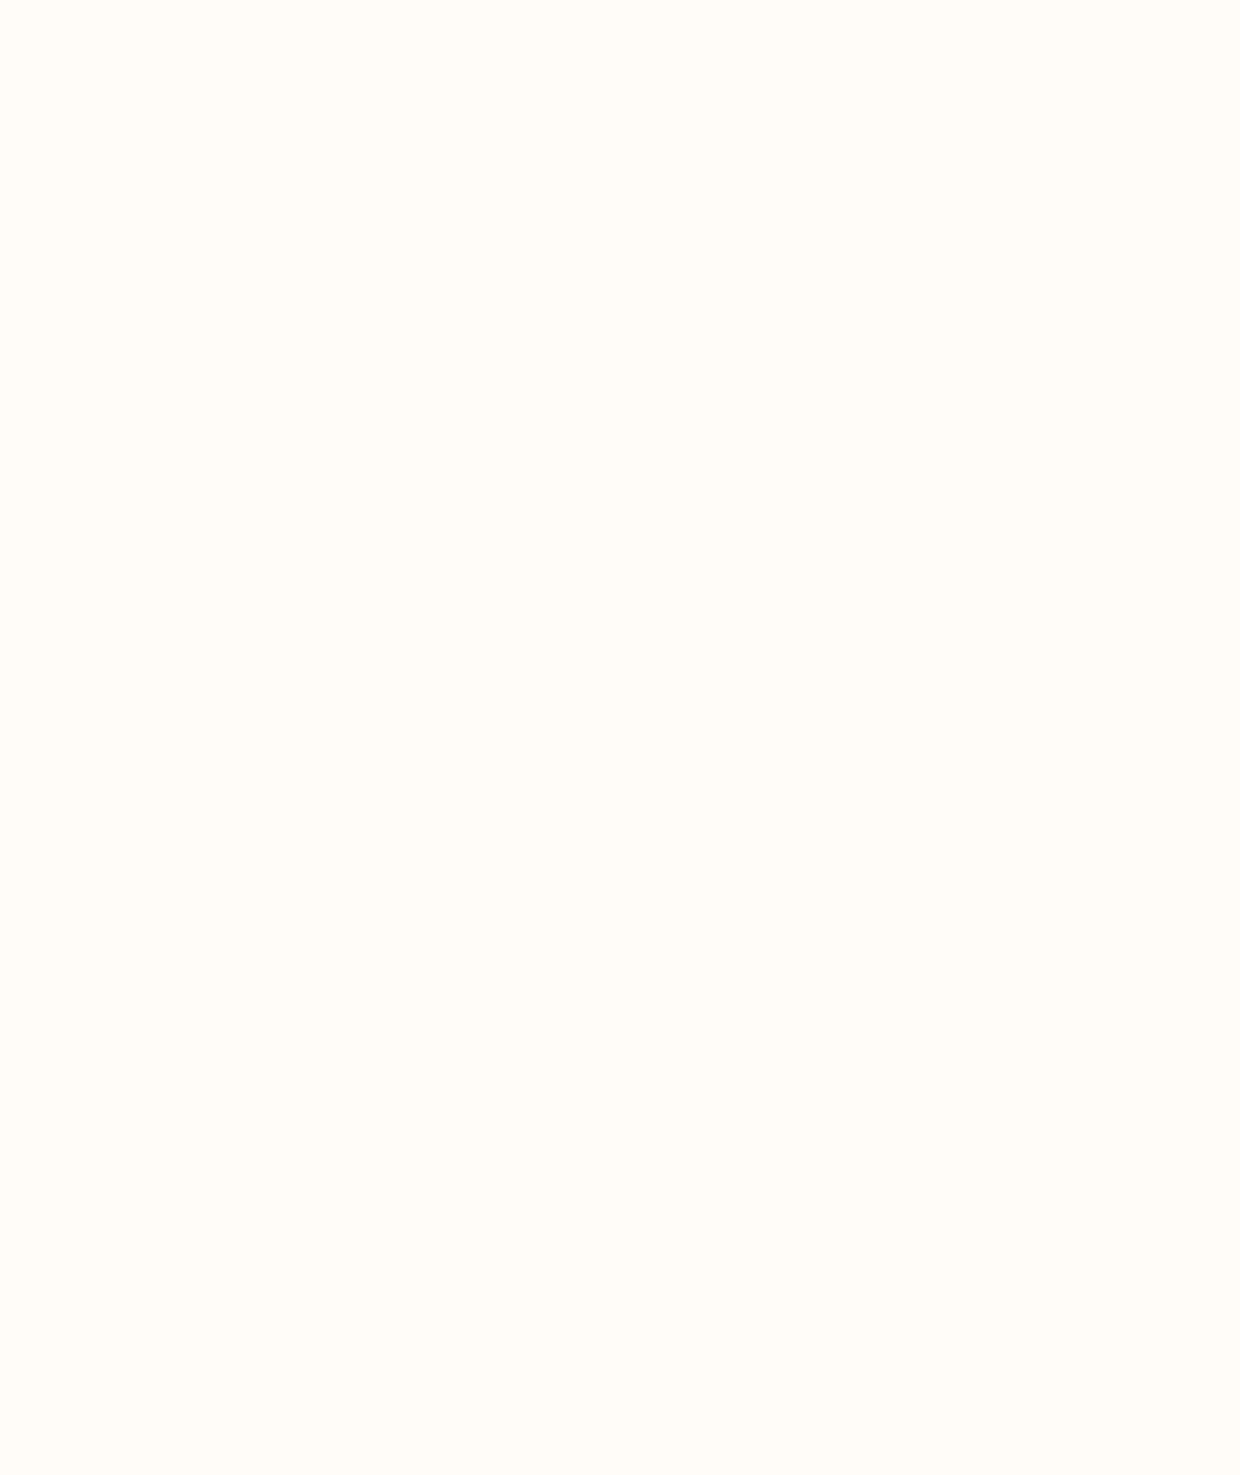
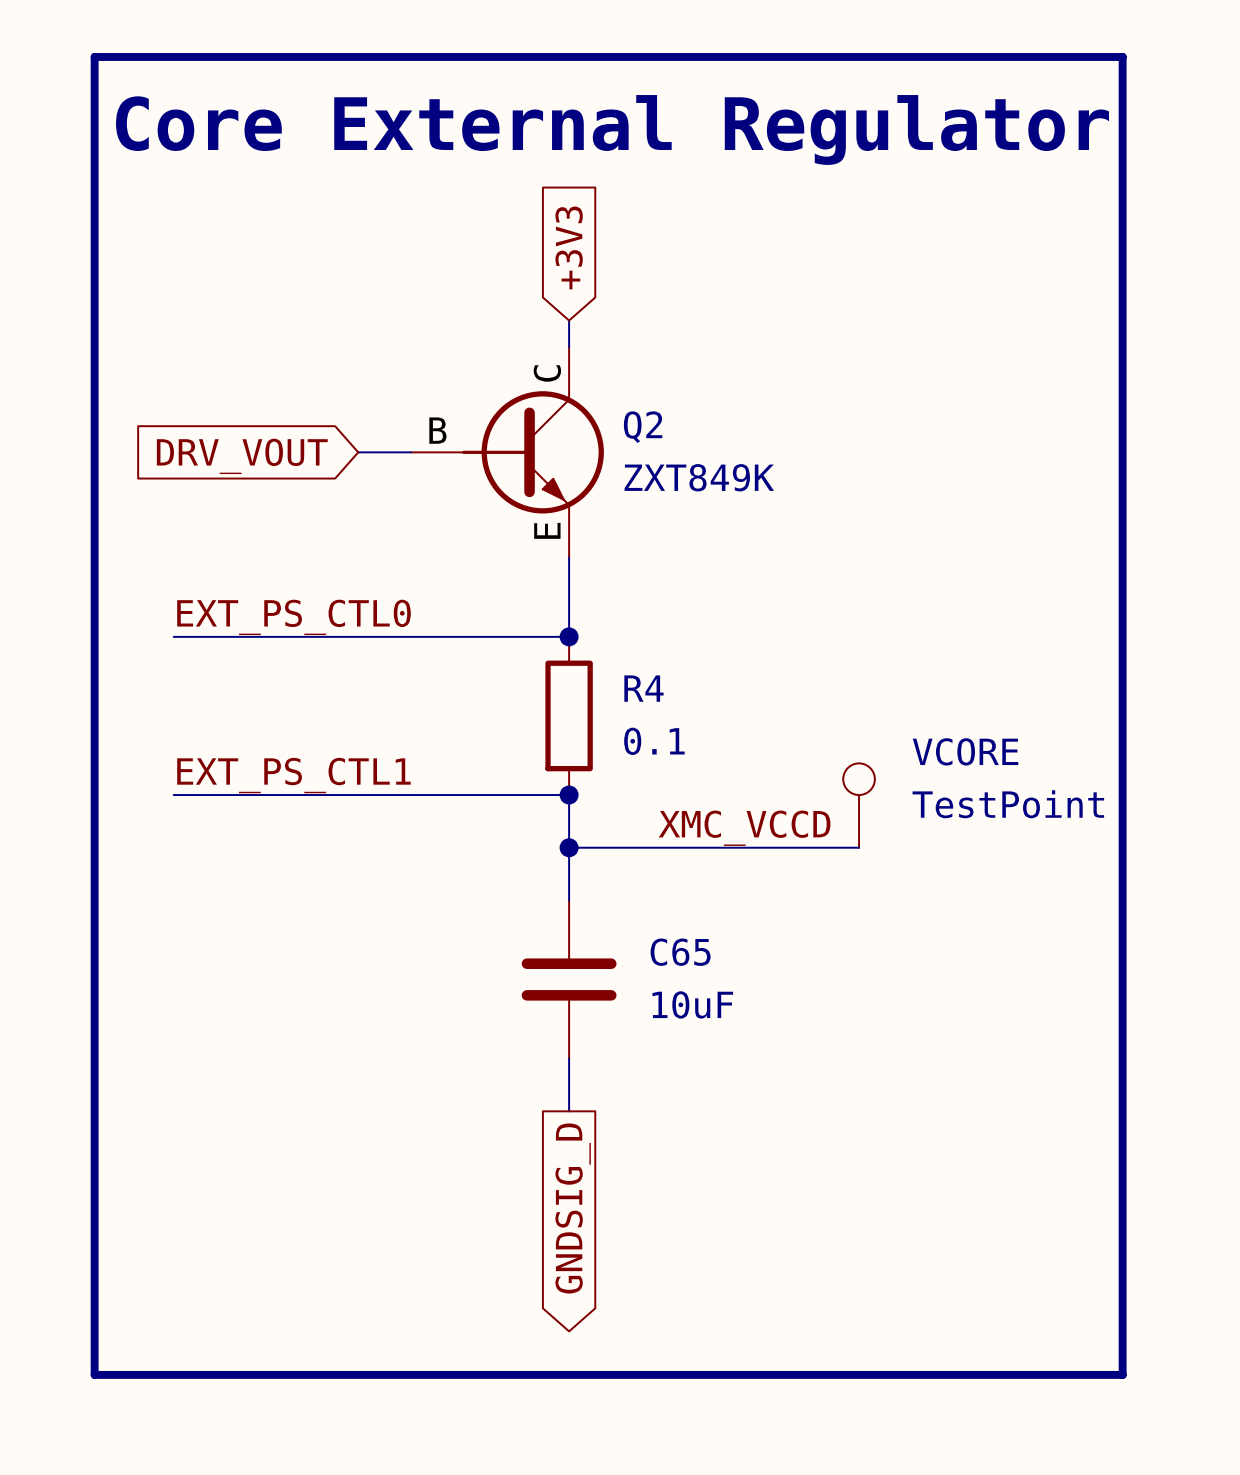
line: none -> (94, 56) (1122, 56) (1122, 1374) (94, 1374) (94, 56)
text: none -> Core External Regulator (612, 129)
global label: none -> +3V3 (569, 247)
wire: none -> (569, 320) (569, 346)
wire: none -> (358, 452) (410, 452)
Q2: none -> ZXT849K (507, 452)
global label: none -> DRV_VOUT (242, 456)
wire: none -> (569, 557) (569, 636) (173, 636)
label: none -> EXT_PS_CTL0 (294, 617)
junction: none -> (569, 636)
R4: none -> 0.1 (569, 715)
label: none -> EXT_PS_CTL1 (293, 775)
wire: none -> (173, 795) (569, 795) (569, 900)
junction: none -> (569, 795)
VCORE: none -> TestPoint (859, 805)
label: none -> XMC_VCCD (744, 828)
wire: none -> (569, 847) (859, 847)
junction: none -> (569, 847)
C65: none -> 10uF (569, 979)
wire: none -> (569, 1058) (569, 1111)
global label: none -> GNDSIG_D (573, 1208)

